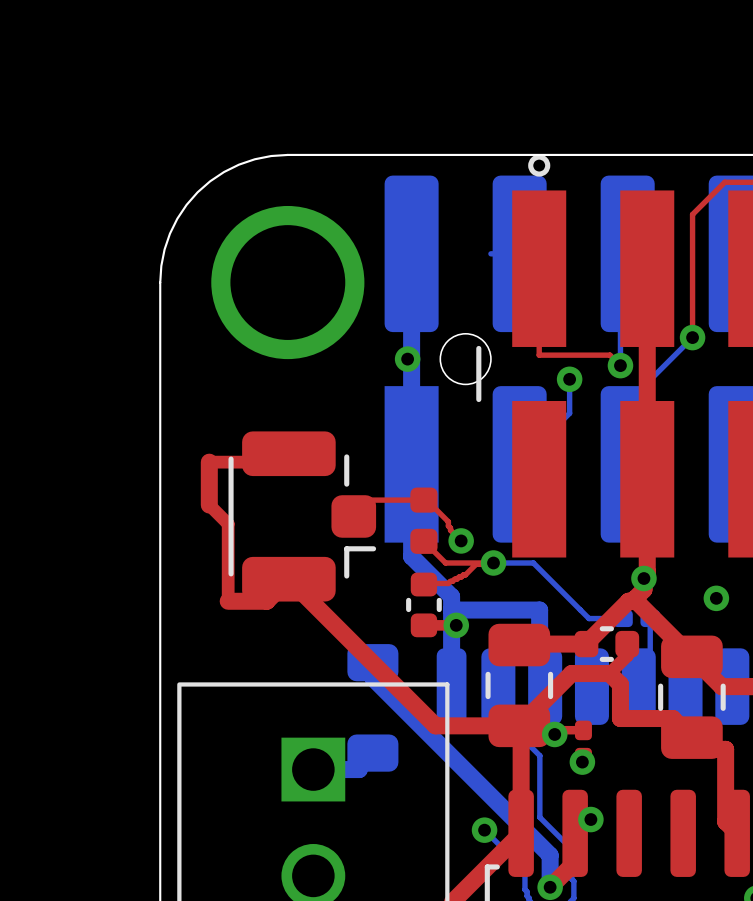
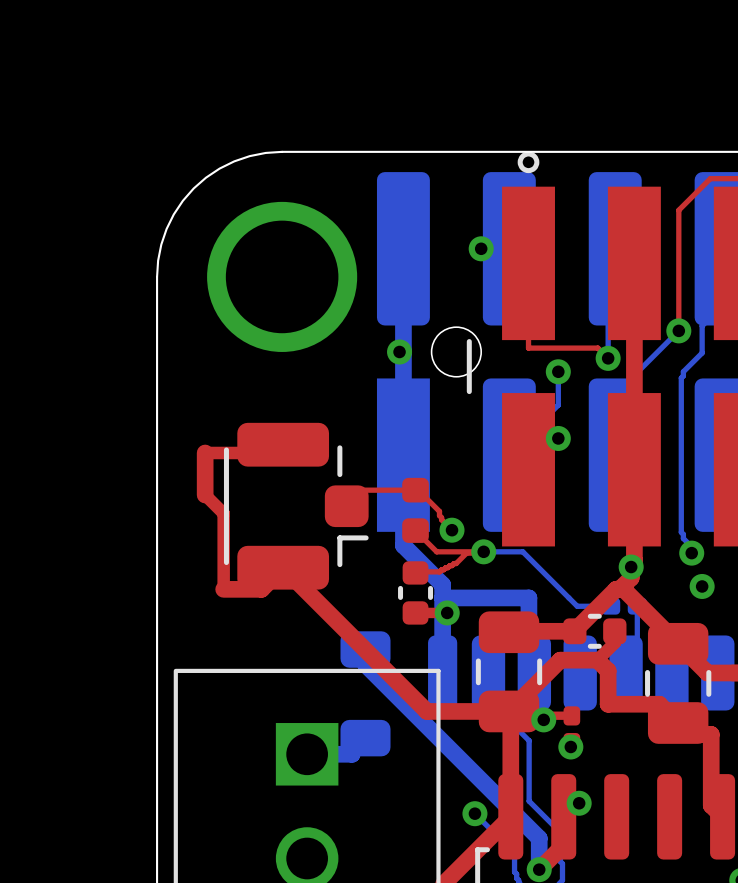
via: none -> (481, 248)
bottom track: none -> (720, 248) (720, 307) (702, 325) (702, 353) (683, 371) (681, 378) (681, 532) (683, 538) (691, 546) (691, 553)
via: none -> (558, 438)
via: none -> (691, 553)

